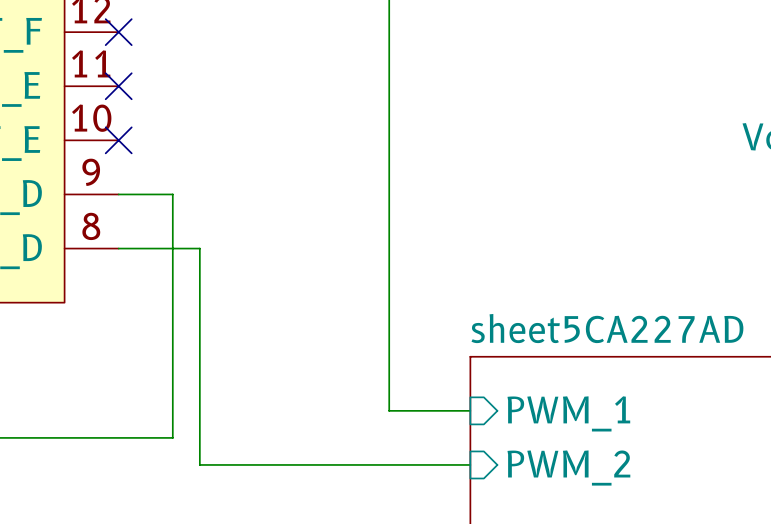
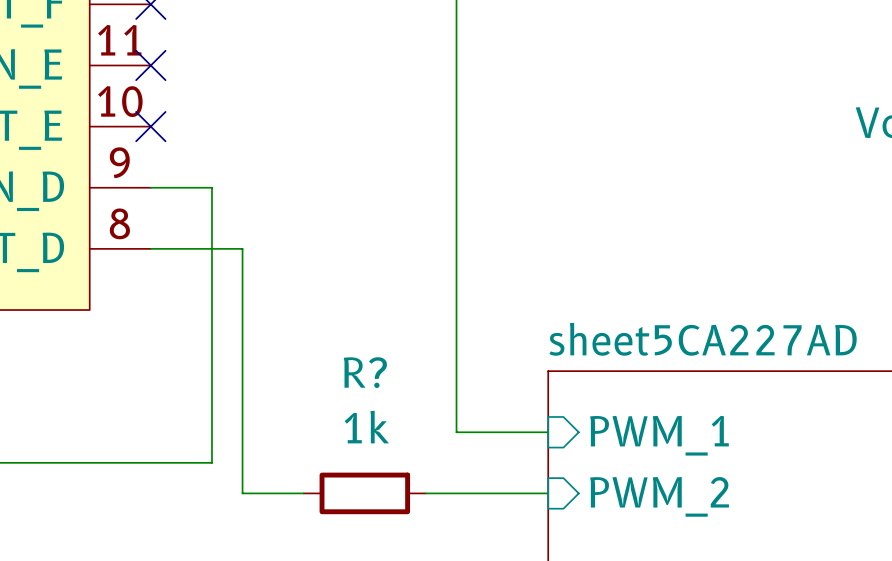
wire: (253, 464) (362, 464) -> none
R?: none -> 1k (364, 493)

